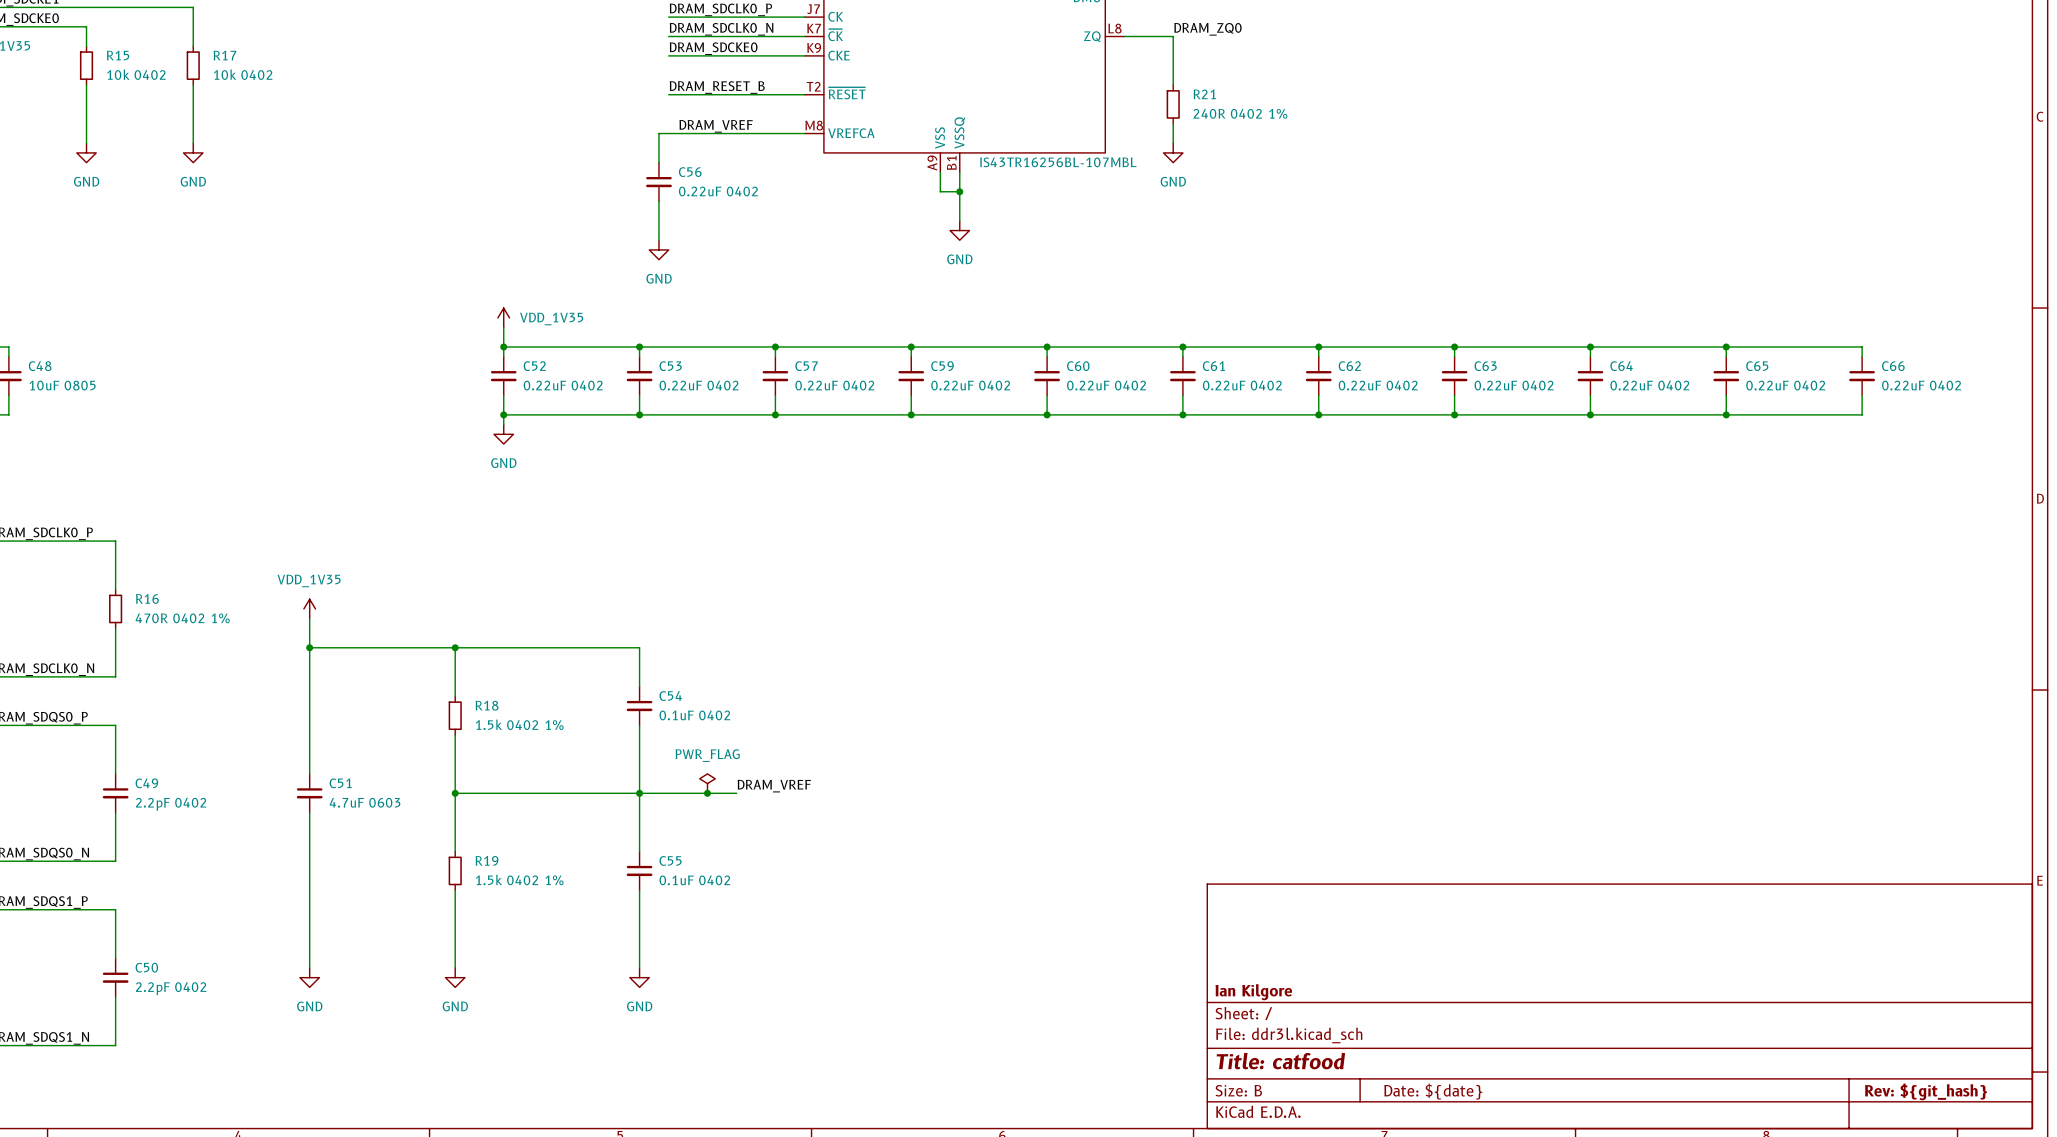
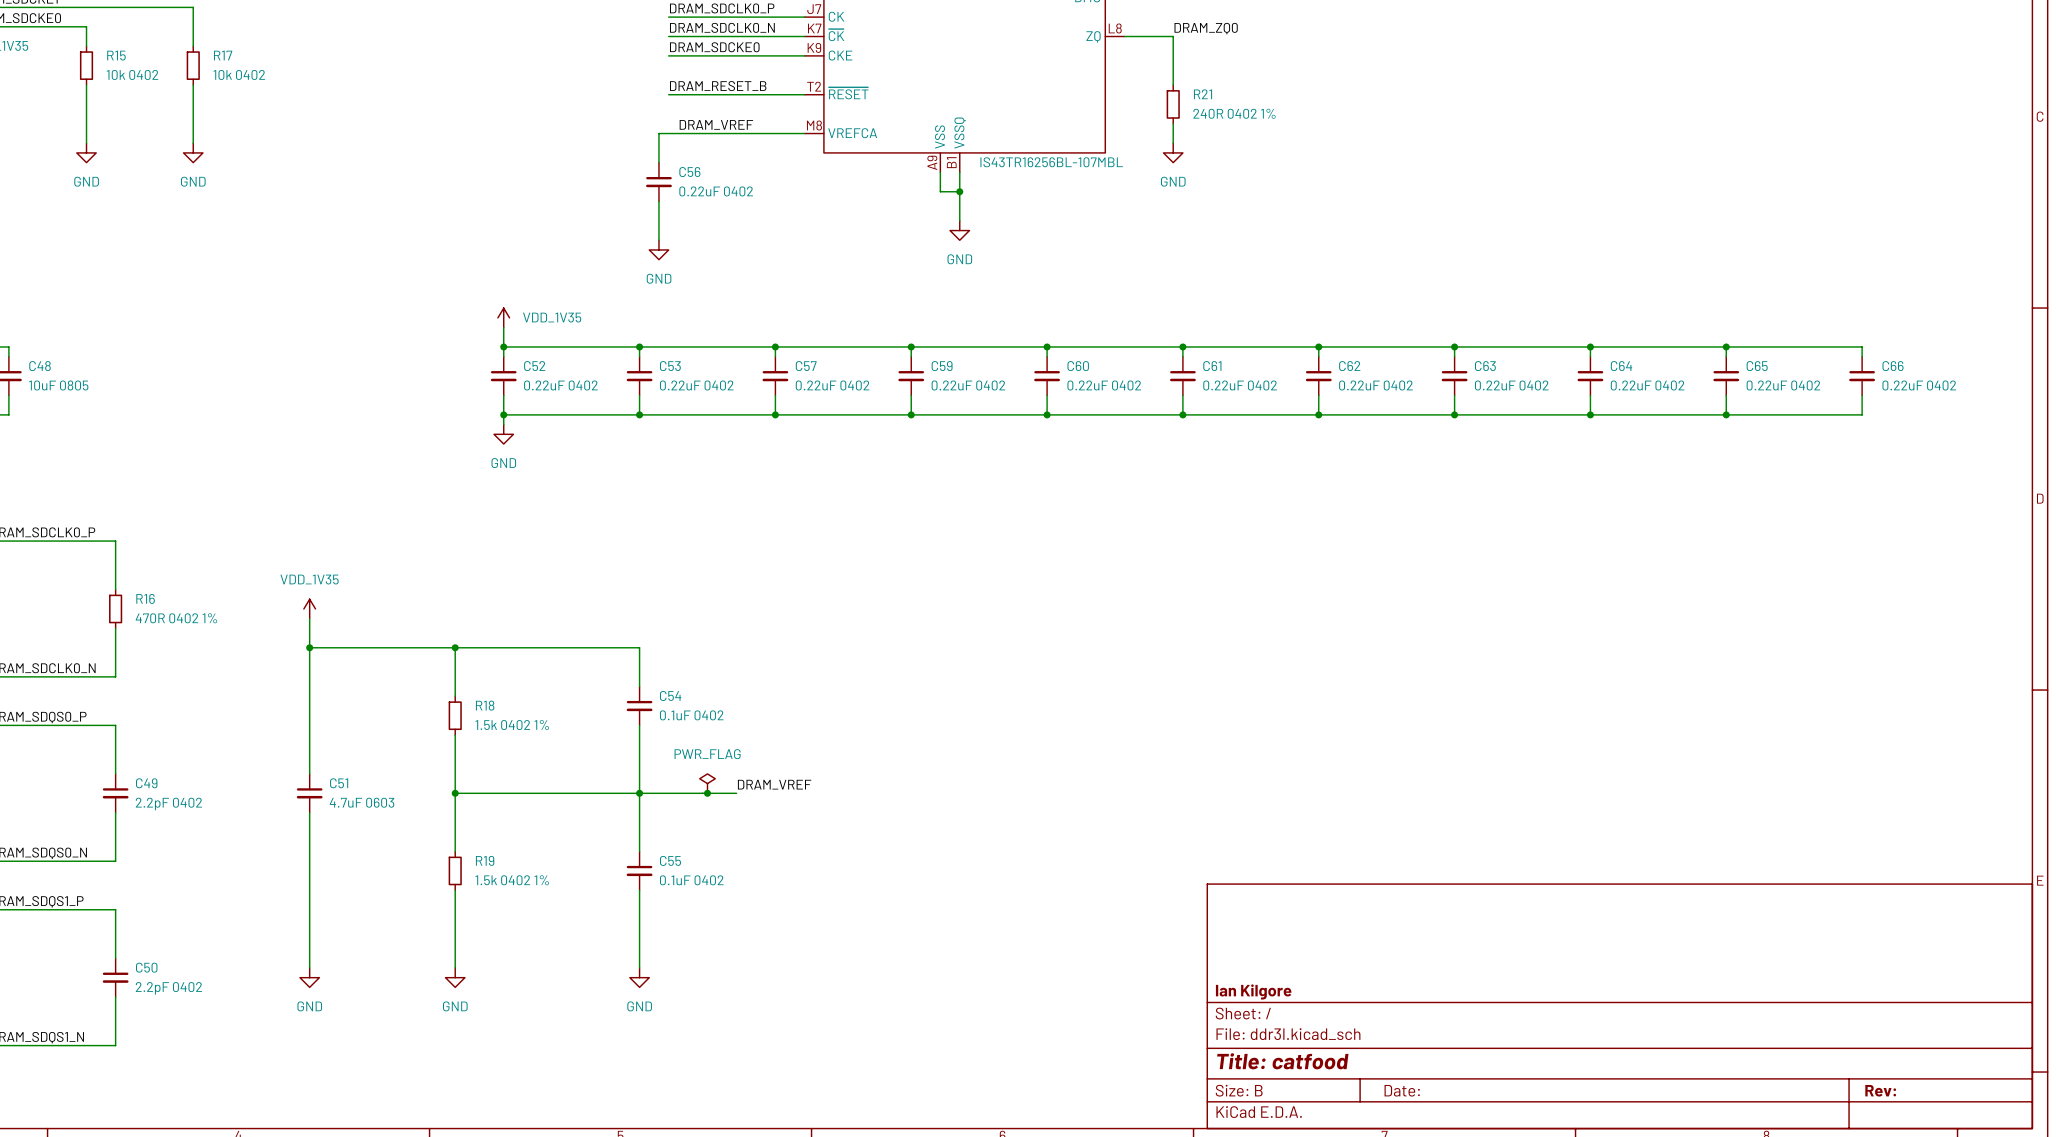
title block: Date: ${date} (1433, 1091) -> Date: (1402, 1090)
title block: Rev: ${git_hash} (1925, 1091) -> Rev: (1880, 1090)

